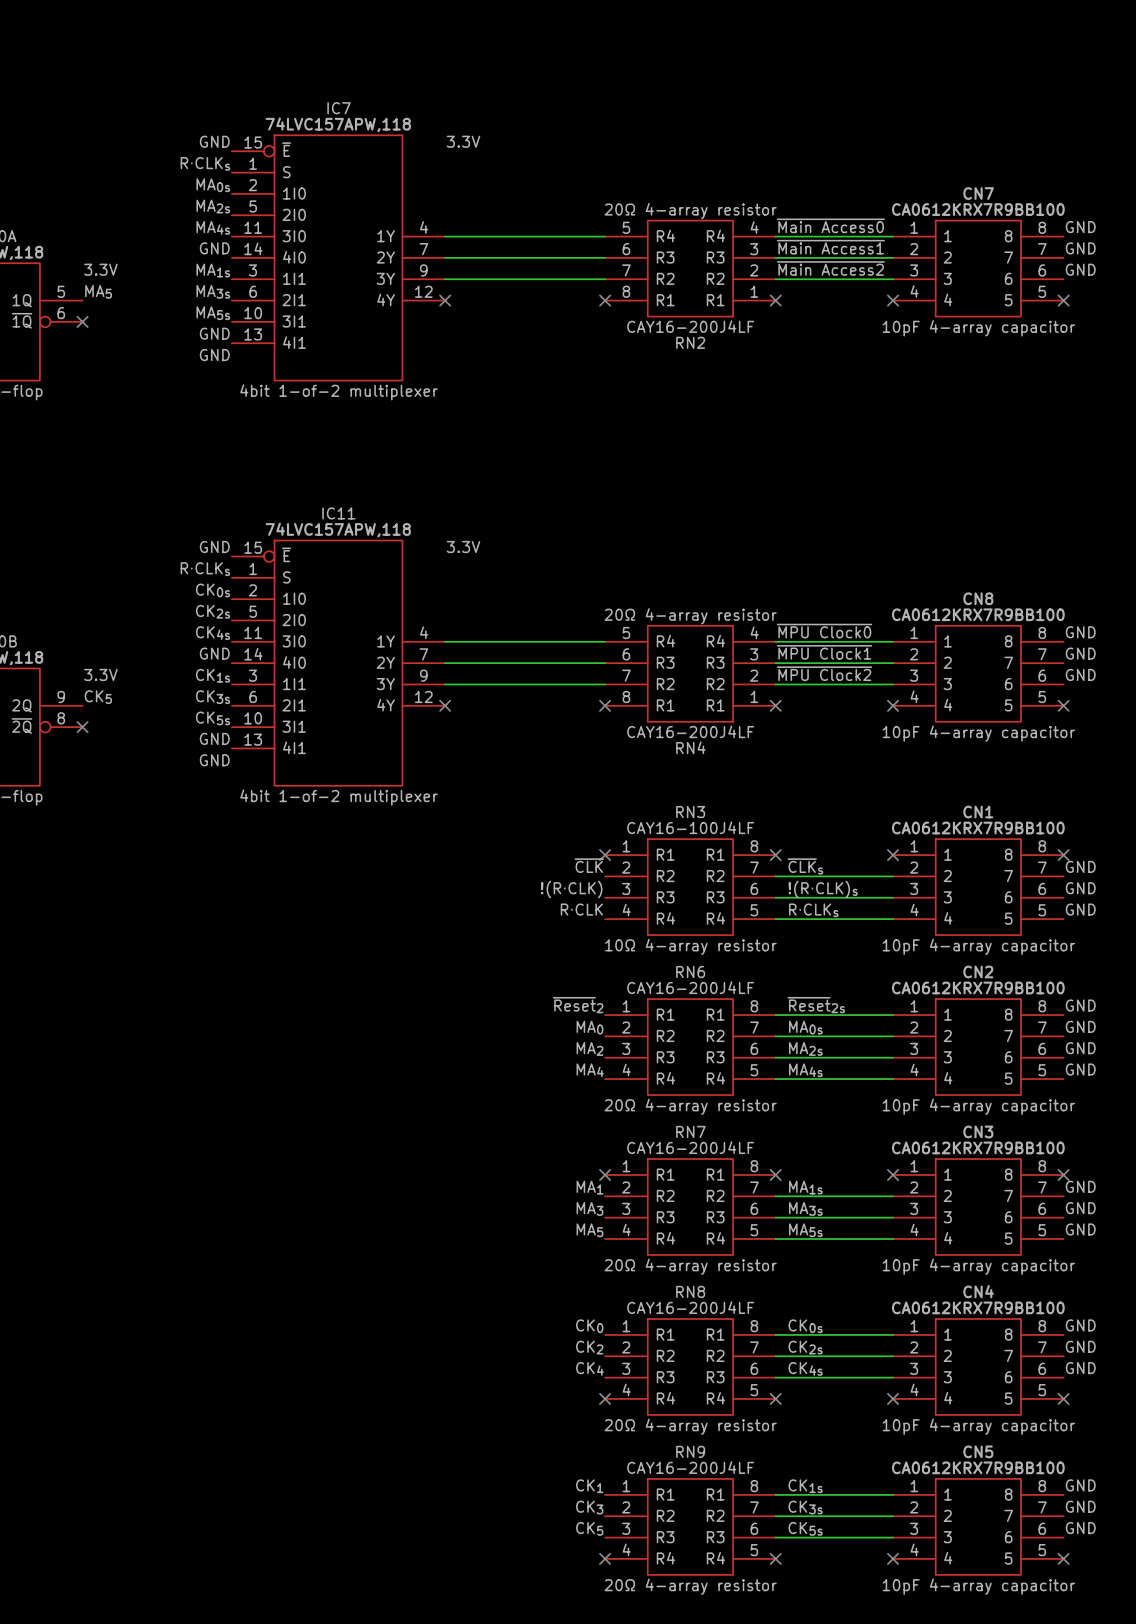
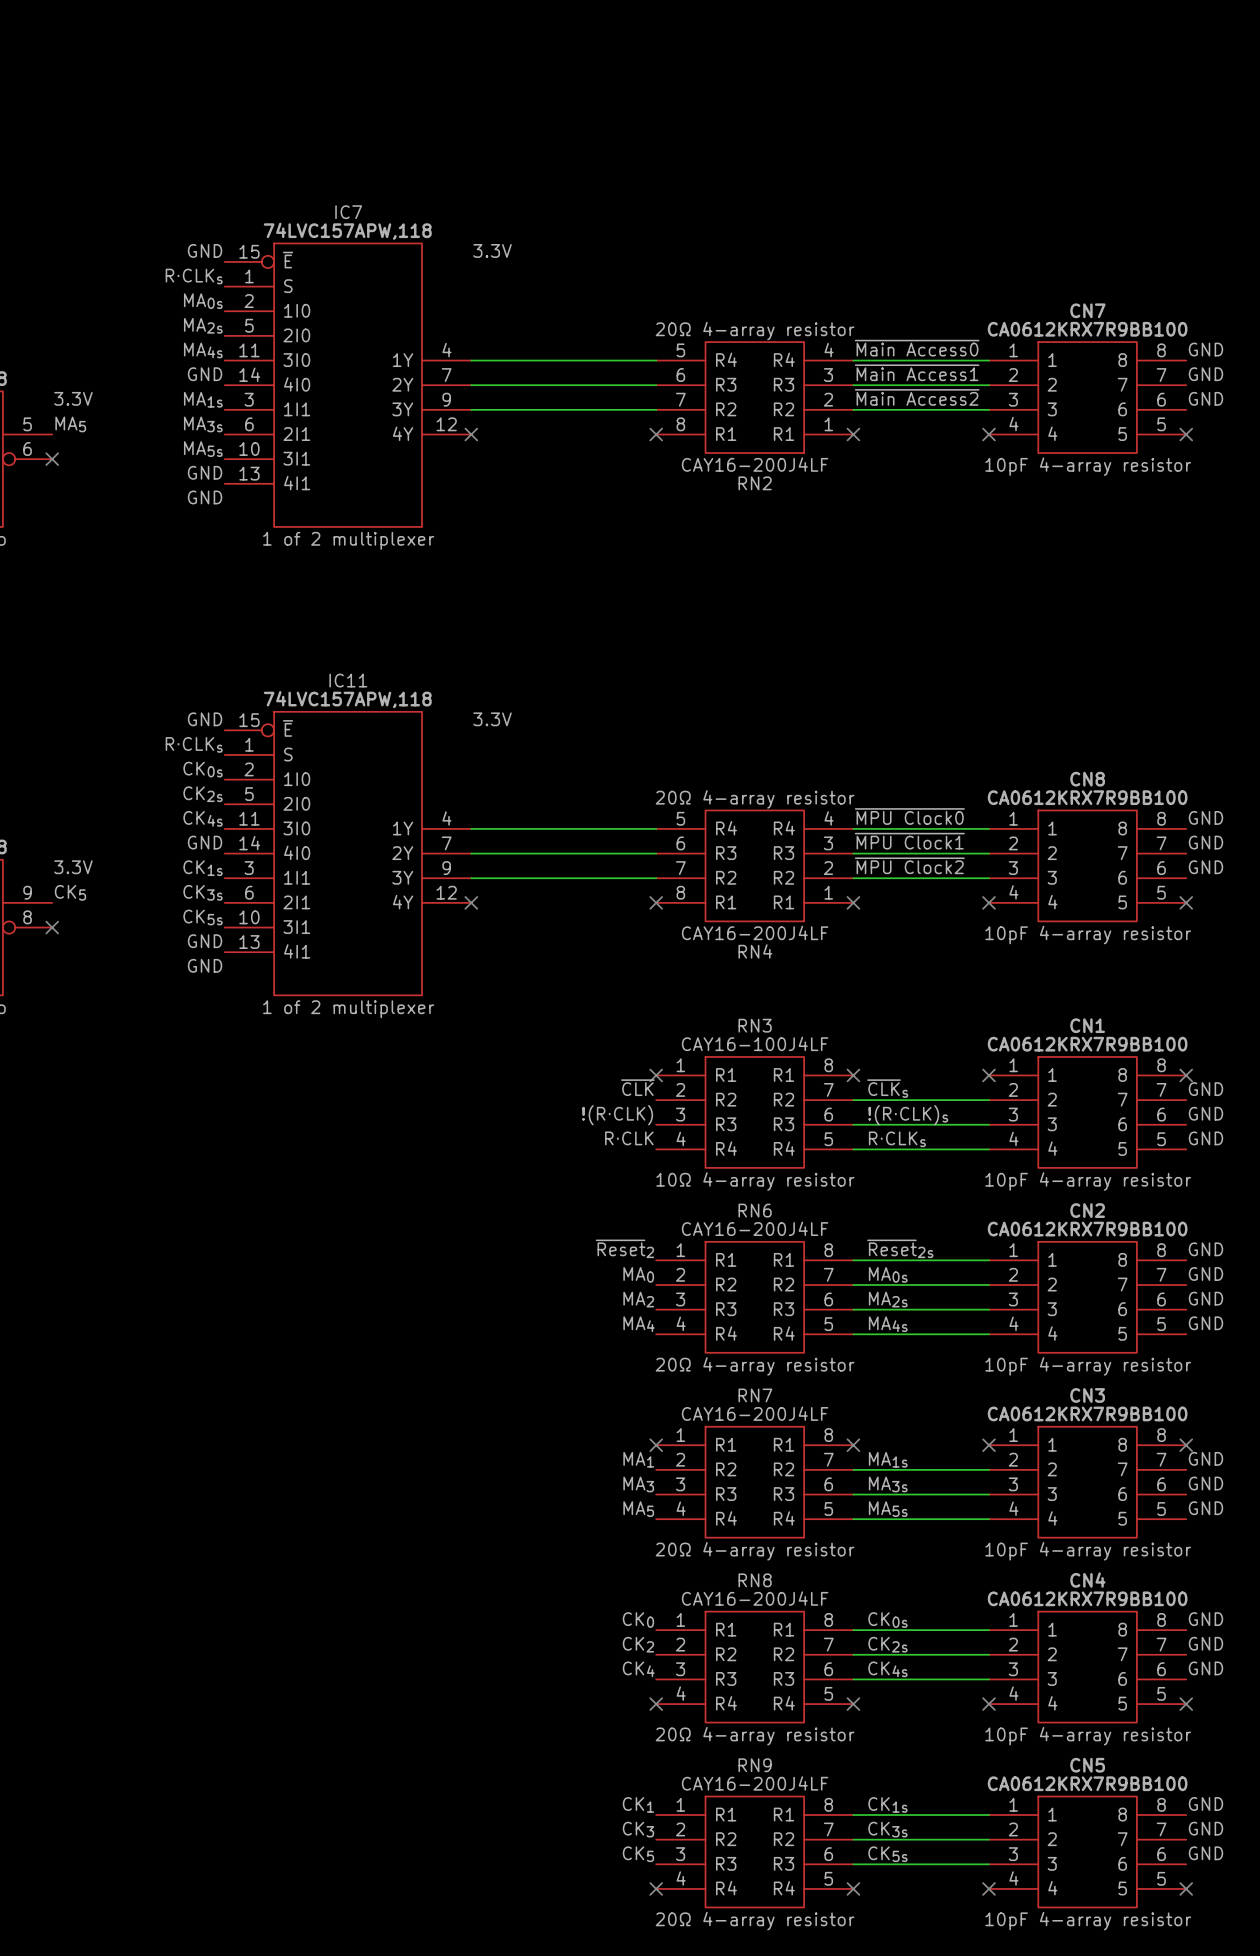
CN7 text: 10pF 4-array capacitor (978, 328) -> 10pF 4-array resistor (1088, 466)
IC7 text: 4bit 1-of-2 multiplexer (339, 392) -> 1 of 2 multiplexer (348, 540)
CN8 text: 10pF 4-array capacitor (978, 733) -> 10pF 4-array resistor (1088, 935)
IC11 text: 4bit 1-of-2 multiplexer (339, 797) -> 1 of 2 multiplexer (348, 1009)
CN1 text: 10pF 4-array capacitor (978, 946) -> 10pF 4-array resistor (1088, 1181)
CN2 text: 10pF 4-array capacitor (978, 1106) -> 10pF 4-array resistor (1088, 1366)
CN3 text: 10pF 4-array capacitor (978, 1266) -> 10pF 4-array resistor (1088, 1551)
CN4 text: 10pF 4-array capacitor (978, 1426) -> 10pF 4-array resistor (1088, 1736)
CN5 text: 10pF 4-array capacitor (978, 1586) -> 10pF 4-array resistor (1088, 1921)

